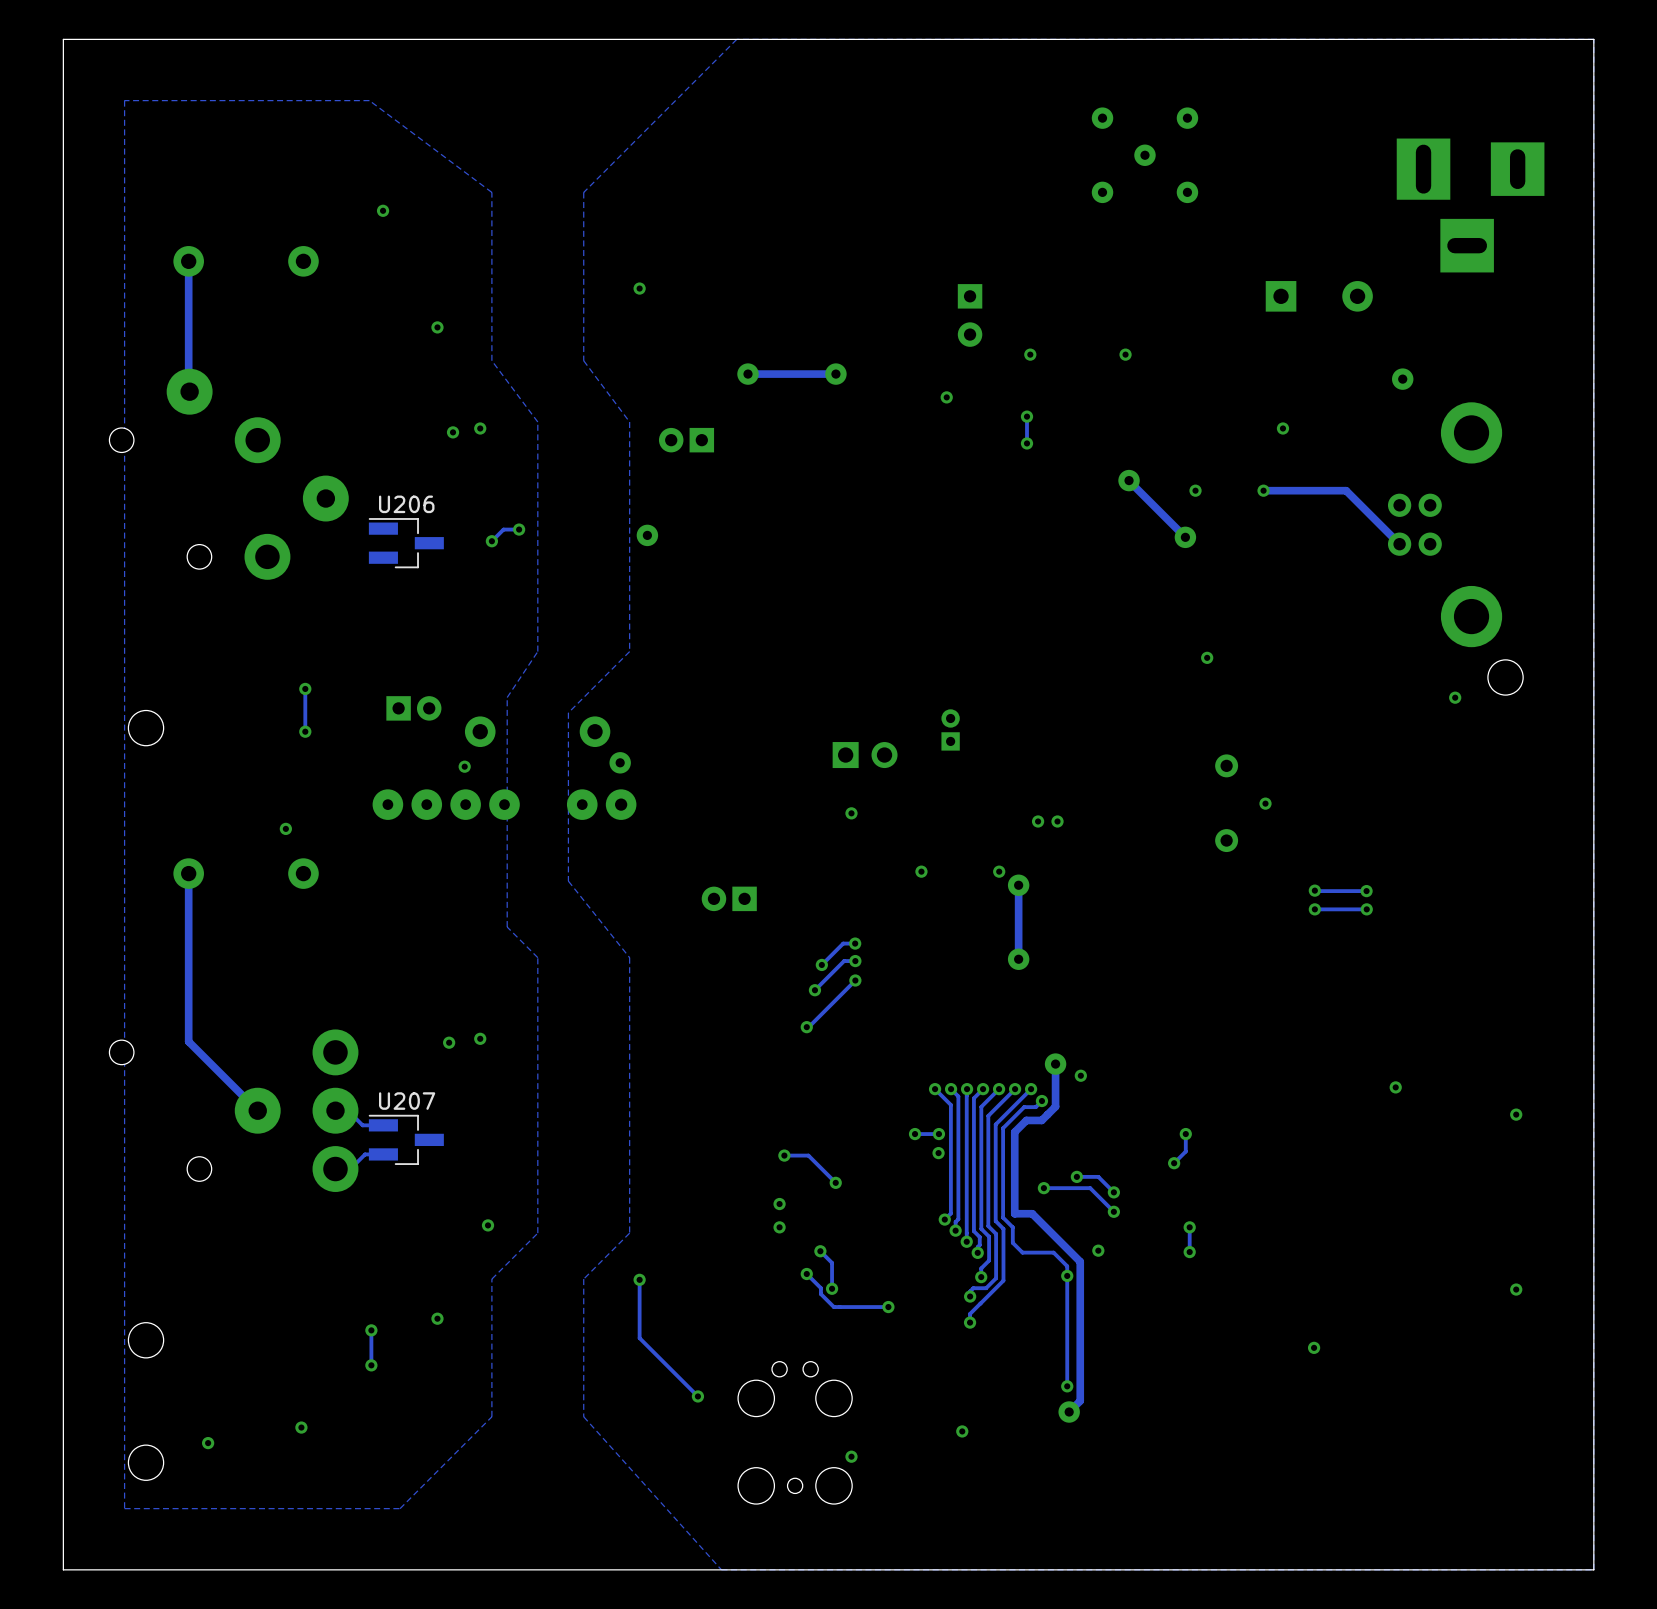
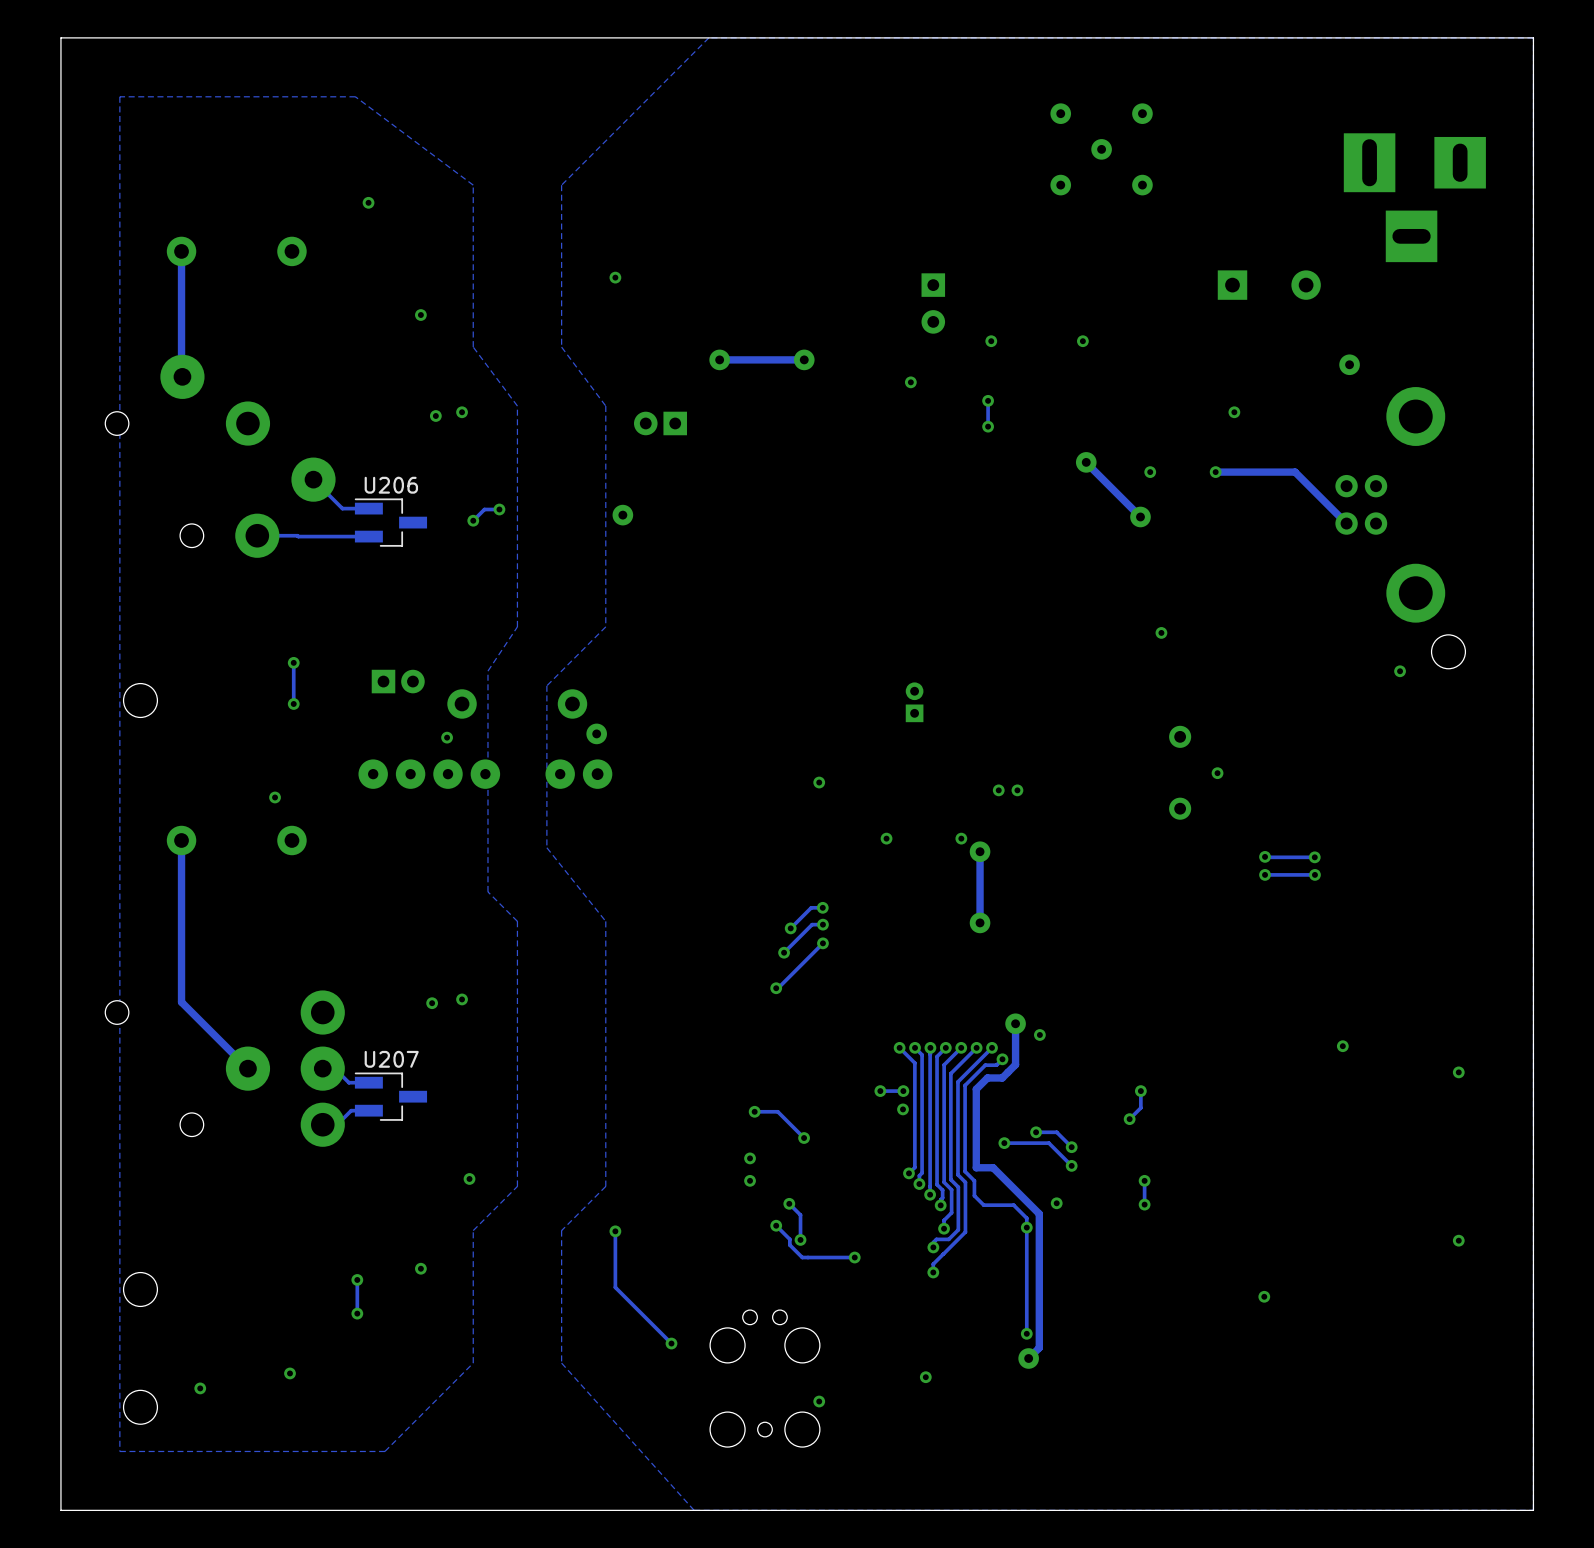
track: none -> (313, 479) (342, 508) (368, 508)
track: none -> (257, 535) (368, 536)
part: (865, 755) -> none
part: (729, 898) -> none

